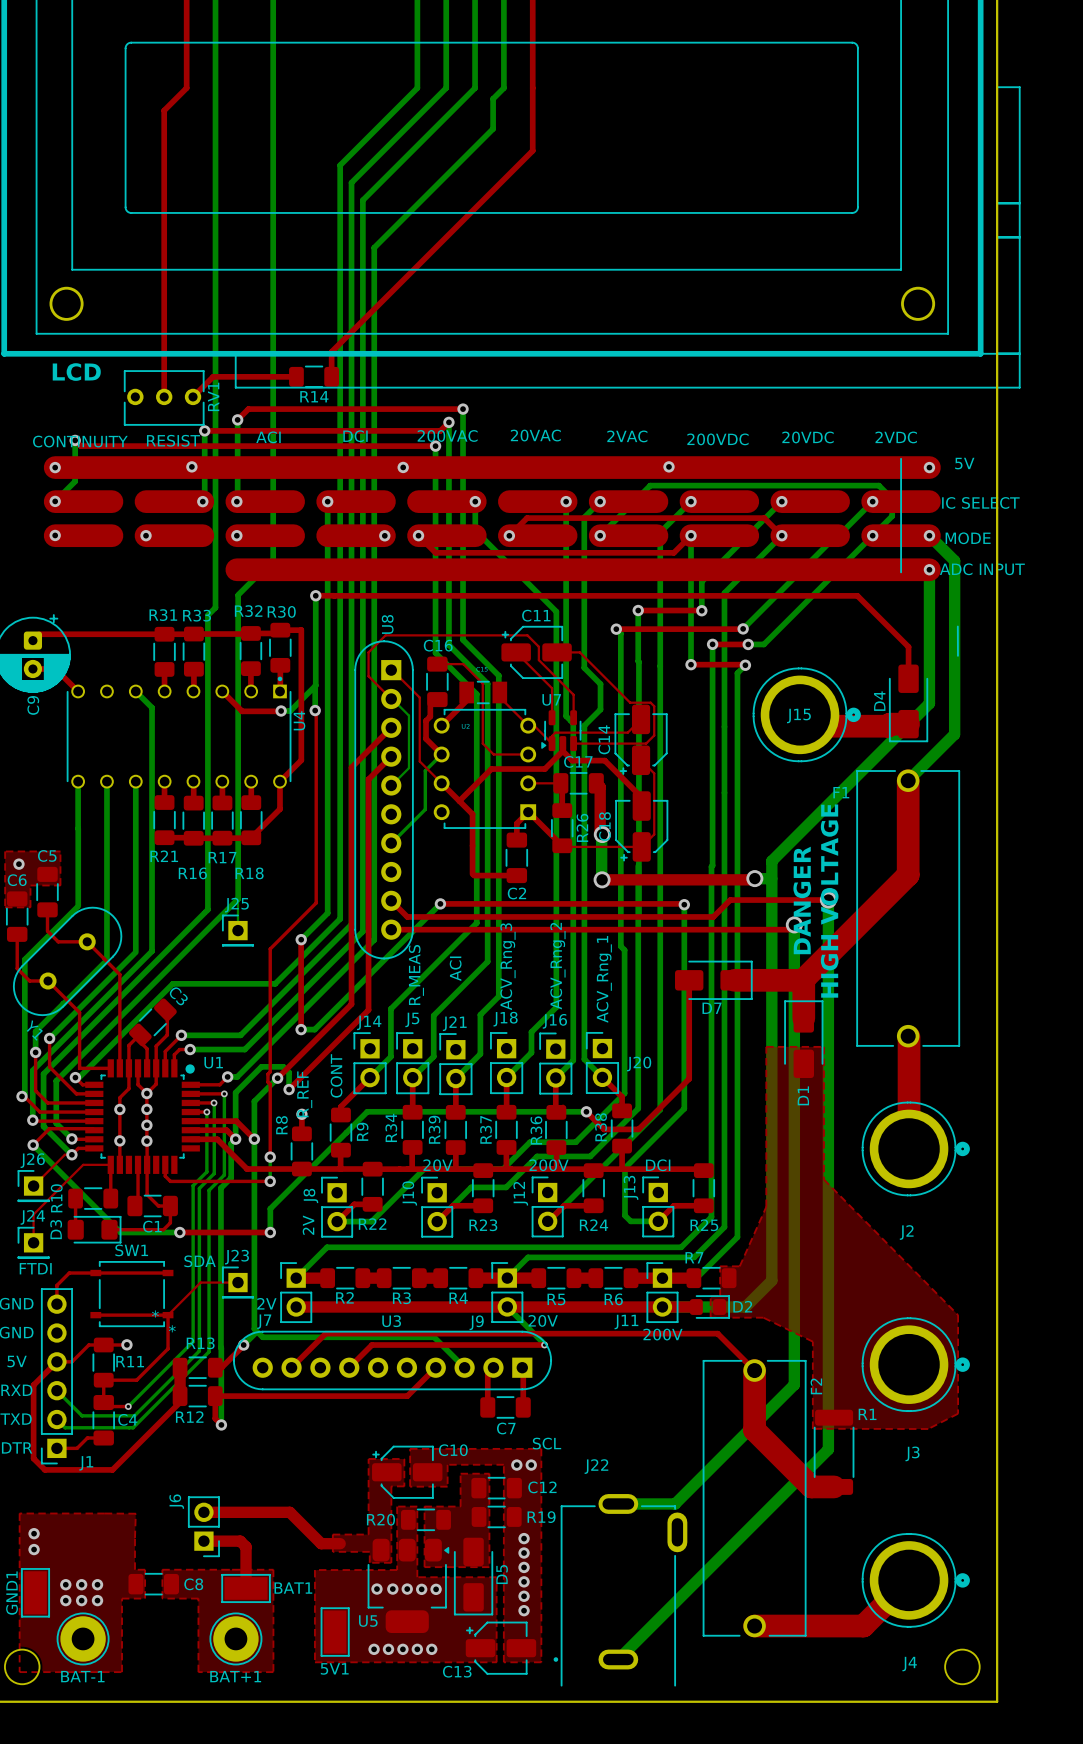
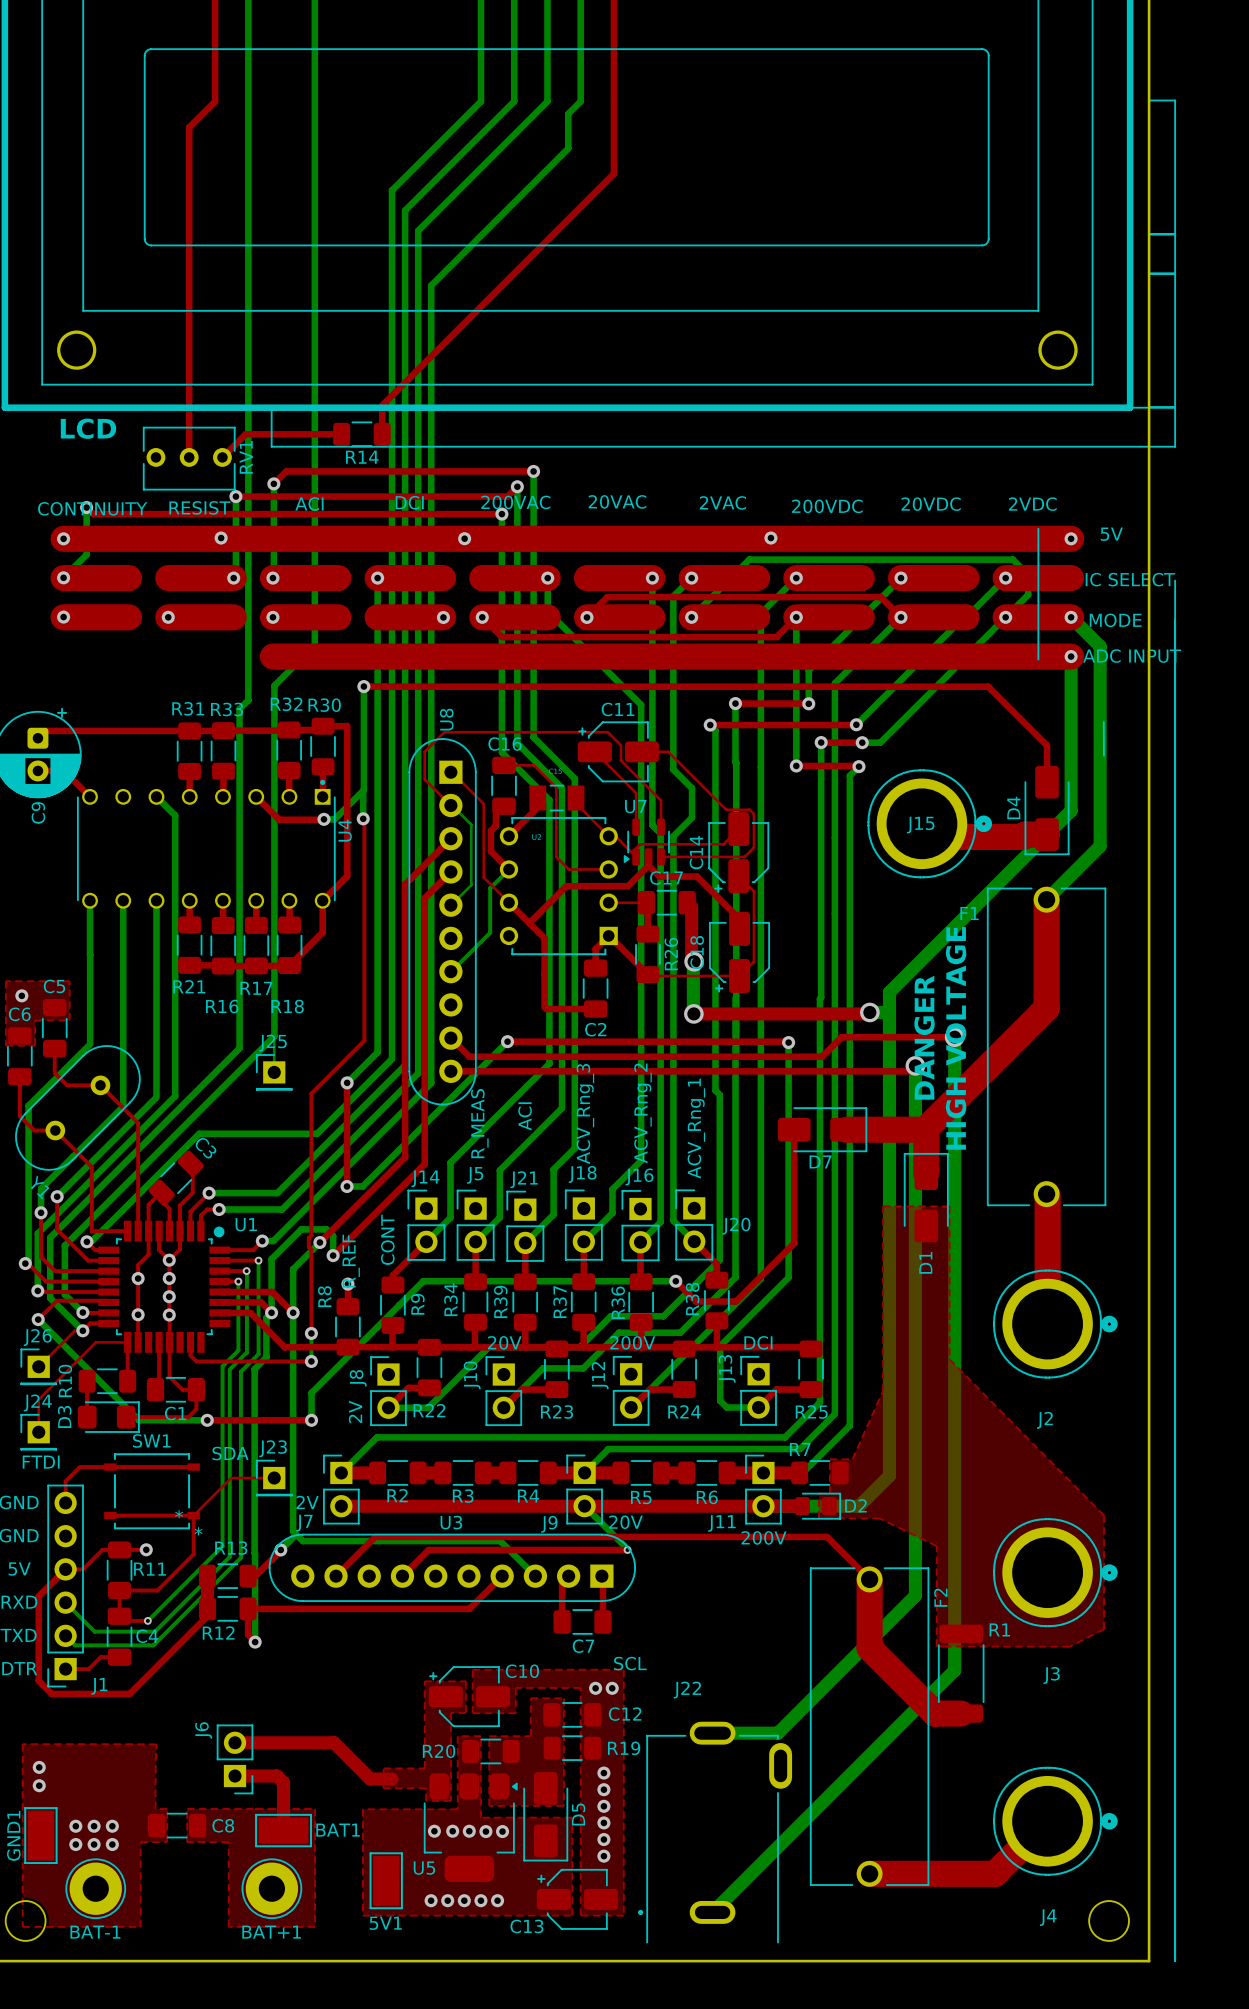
line: none -> (1175, 580) (1175, 1960)

